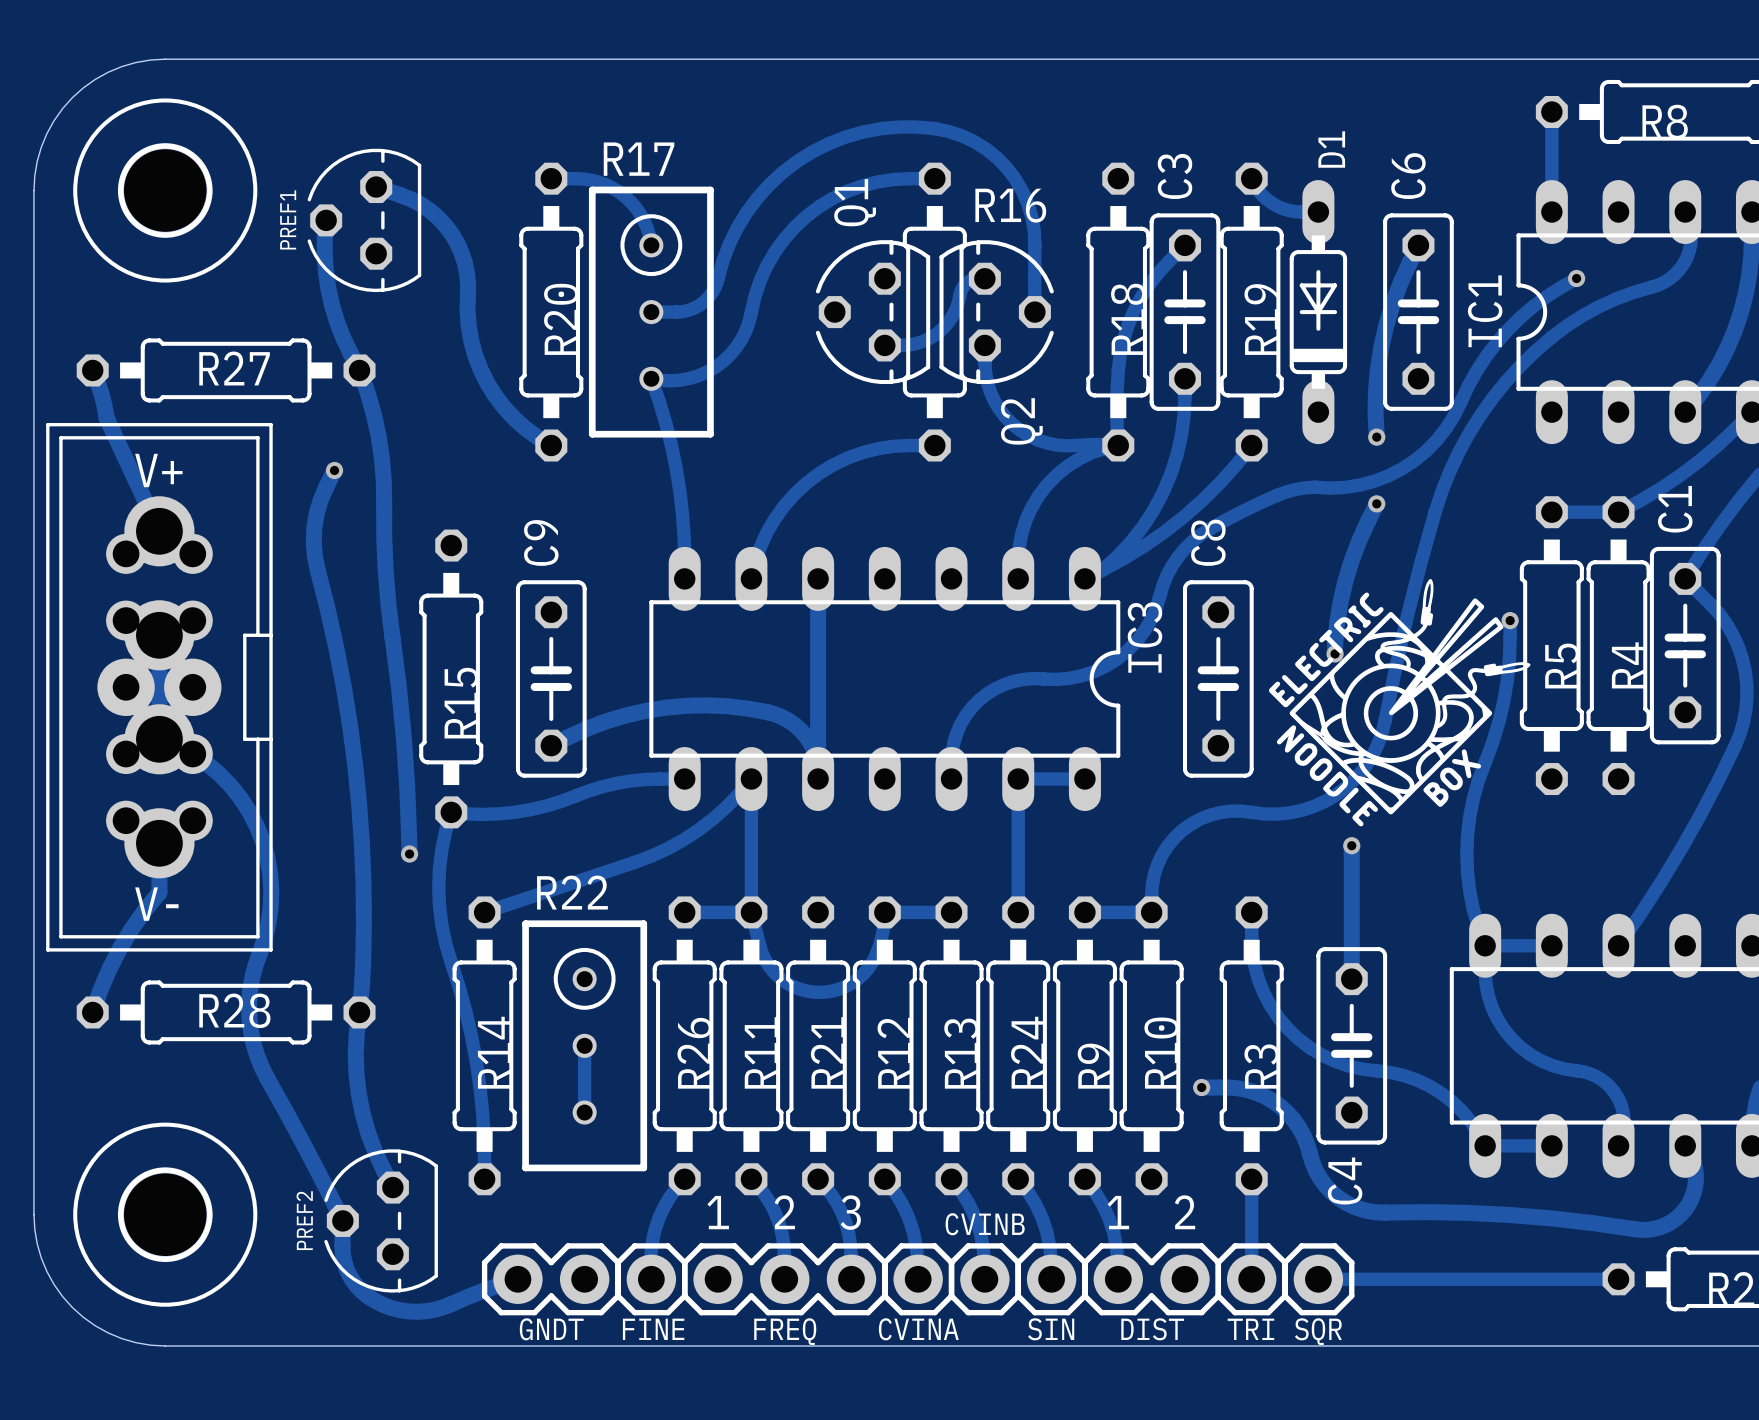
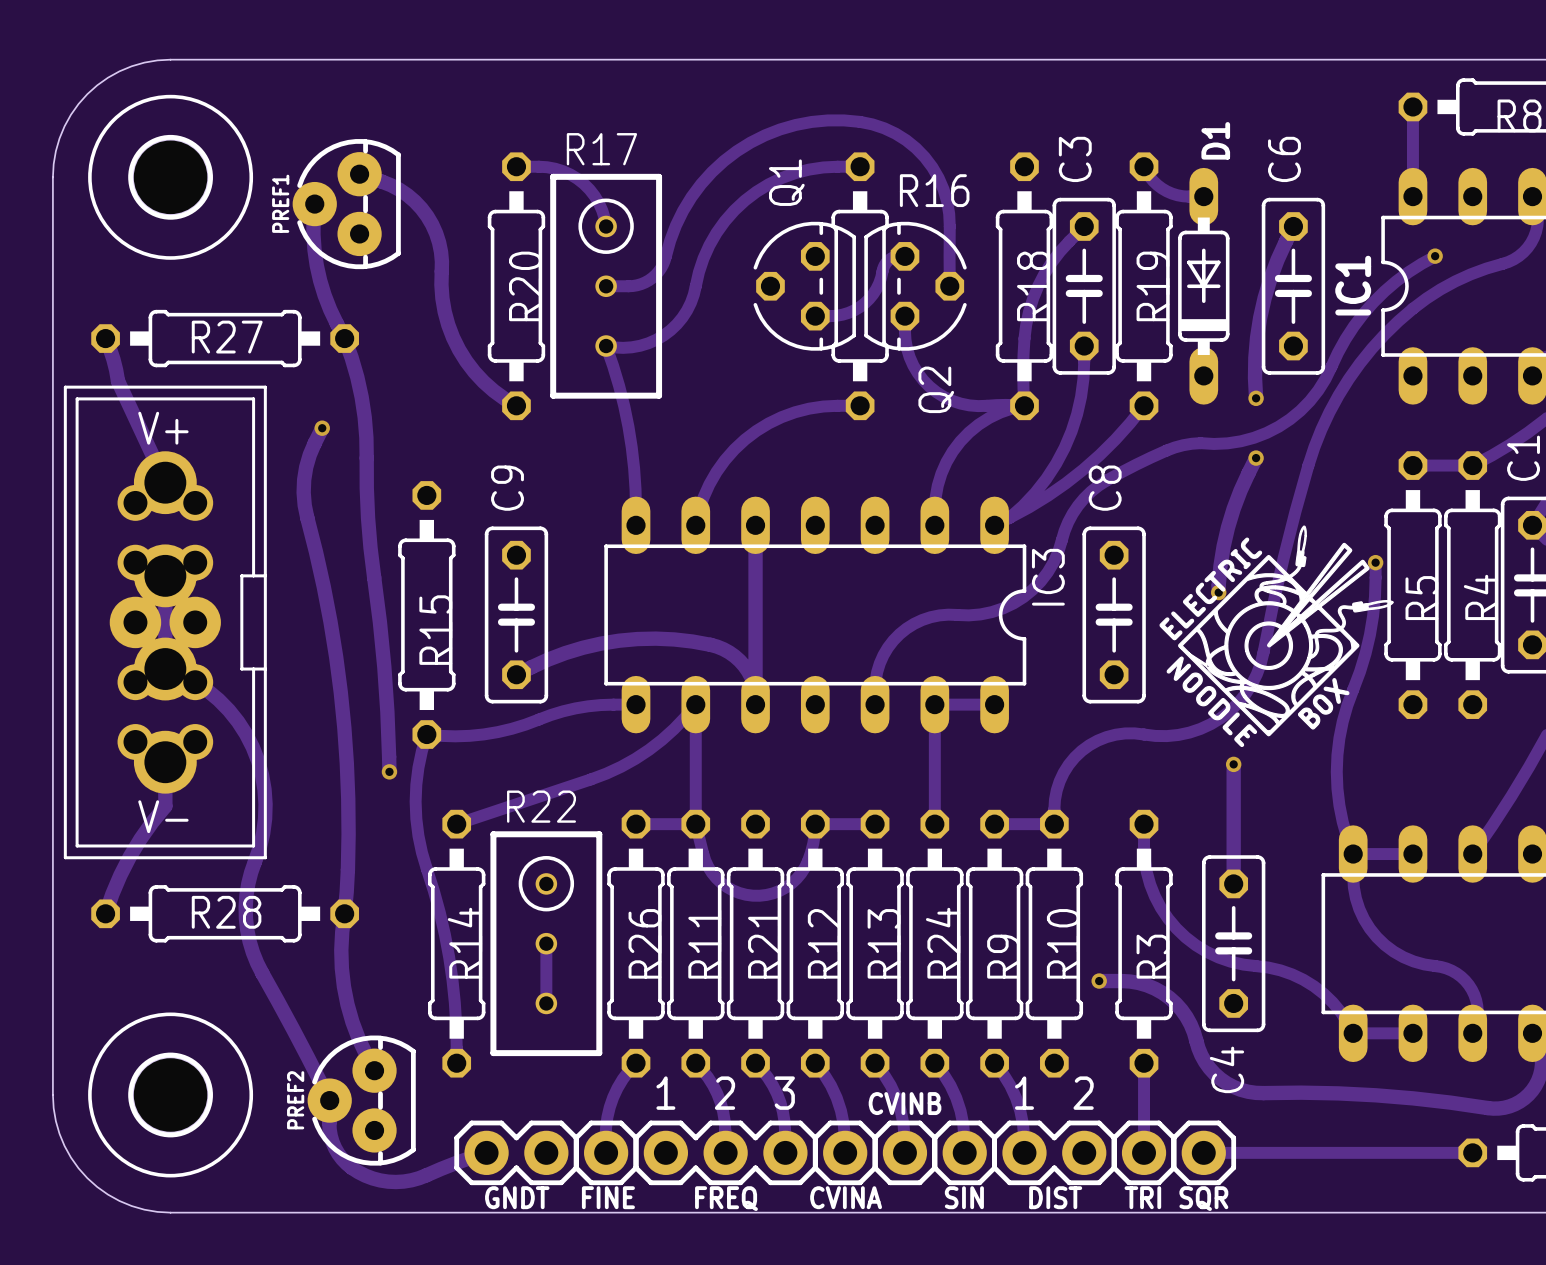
PREF1 footprint: [307, 148, 422, 293] -> [292, 139, 401, 270]
PREF2 footprint: [324, 1149, 438, 1293] -> [307, 1035, 416, 1166]

